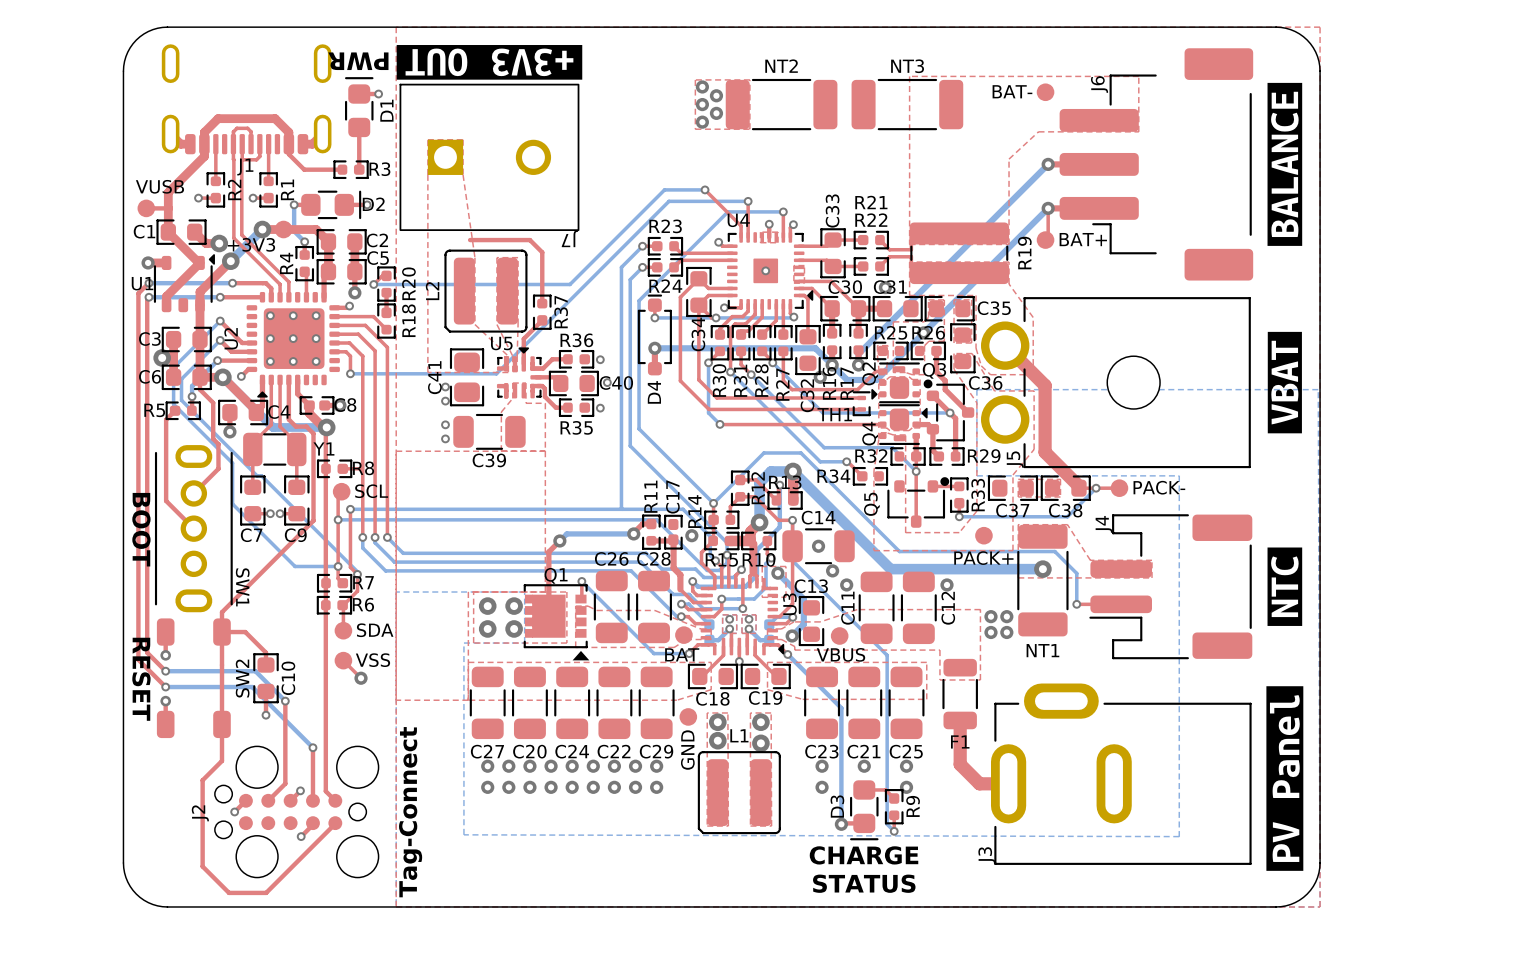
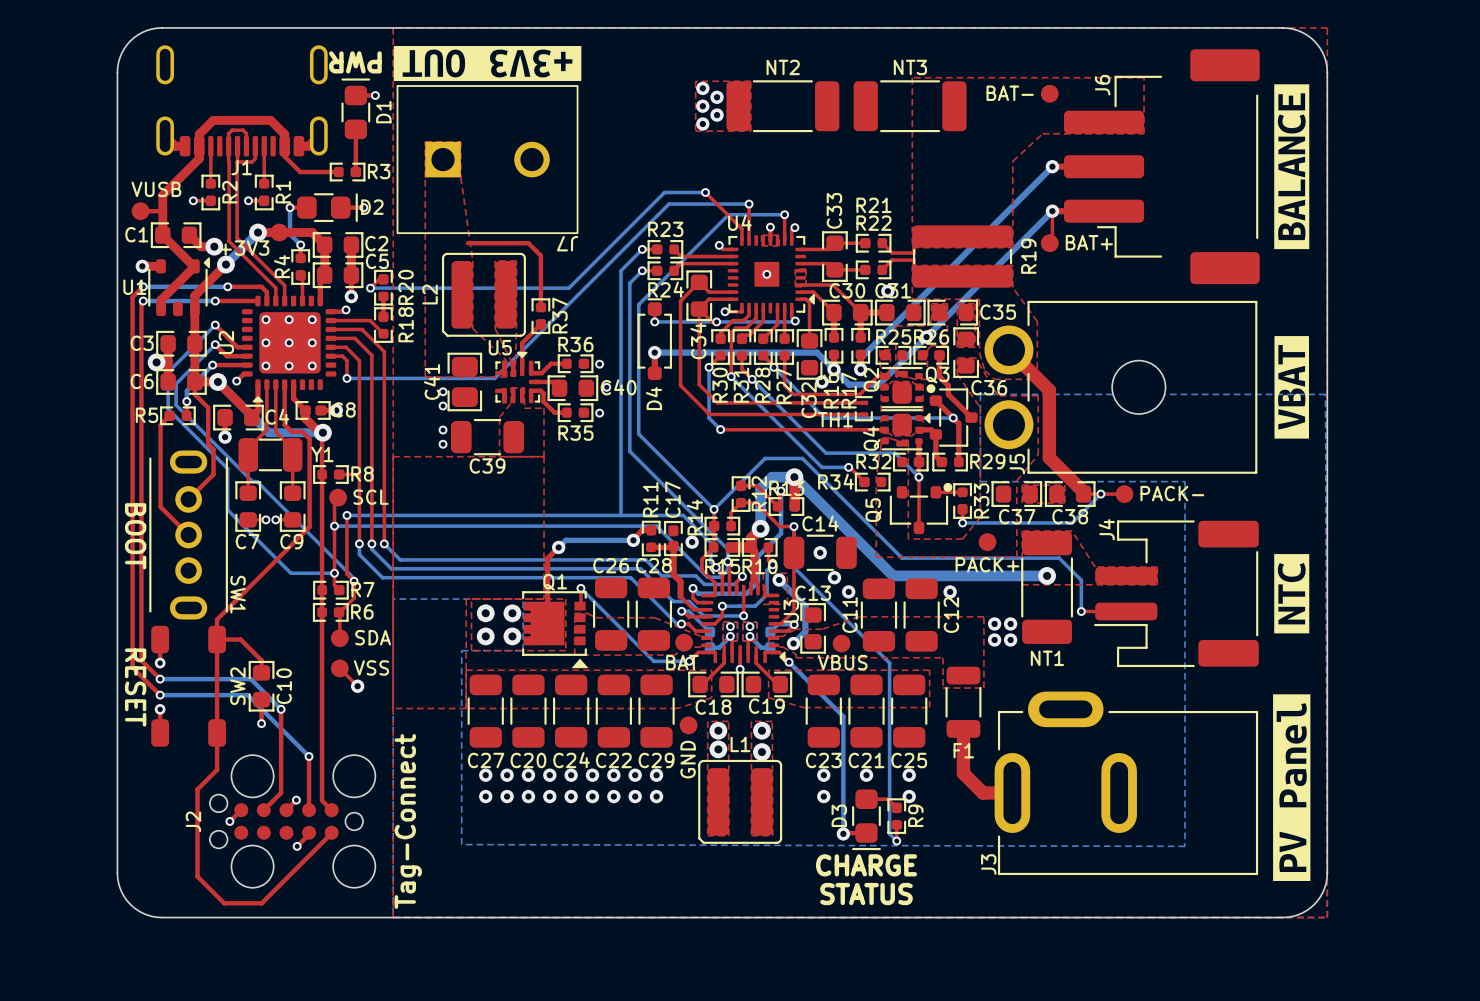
Q2 footprint: [871, 362, 920, 404] -> [881, 366, 923, 409]

